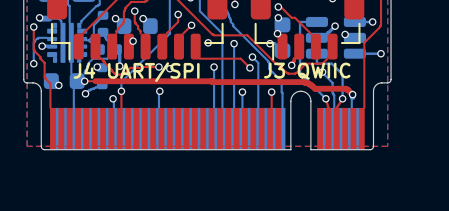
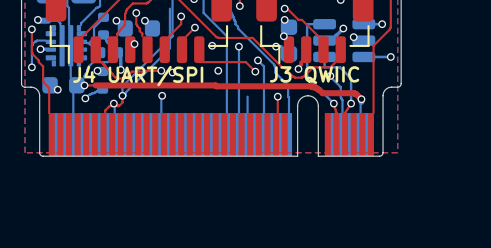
bottom track: none -> (169, 8) (169, 48) (125, 92) (125, 95)
bottom track: (214, 67) (214, 107) -> none
via: (242, 92) -> none
top track: (121, 97) (121, 107) -> (122, 102) (118, 106) (109, 106) (105, 113)

